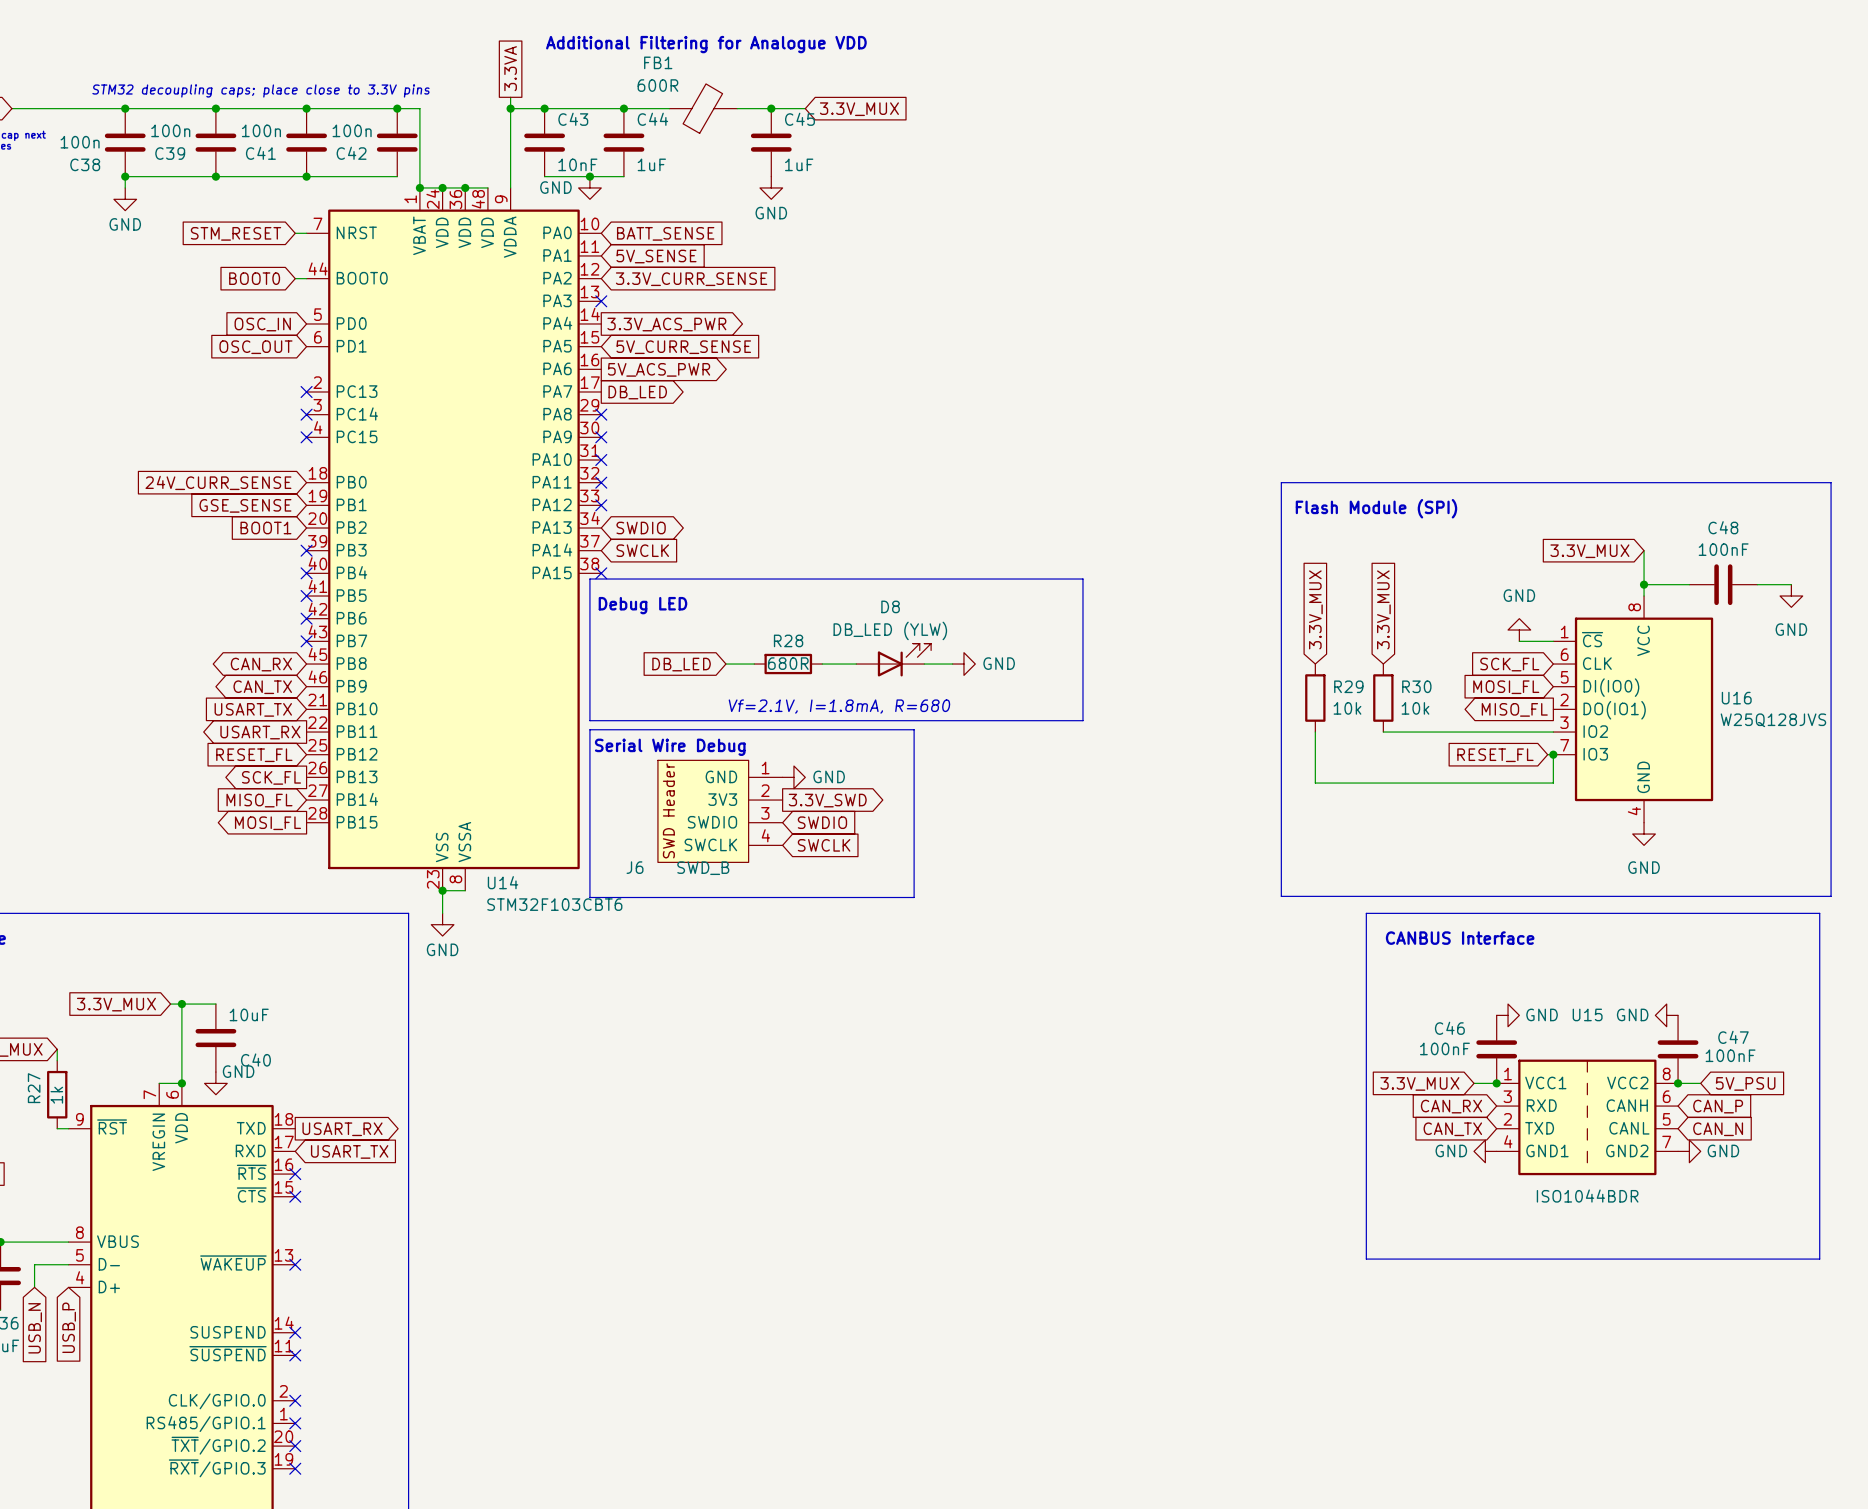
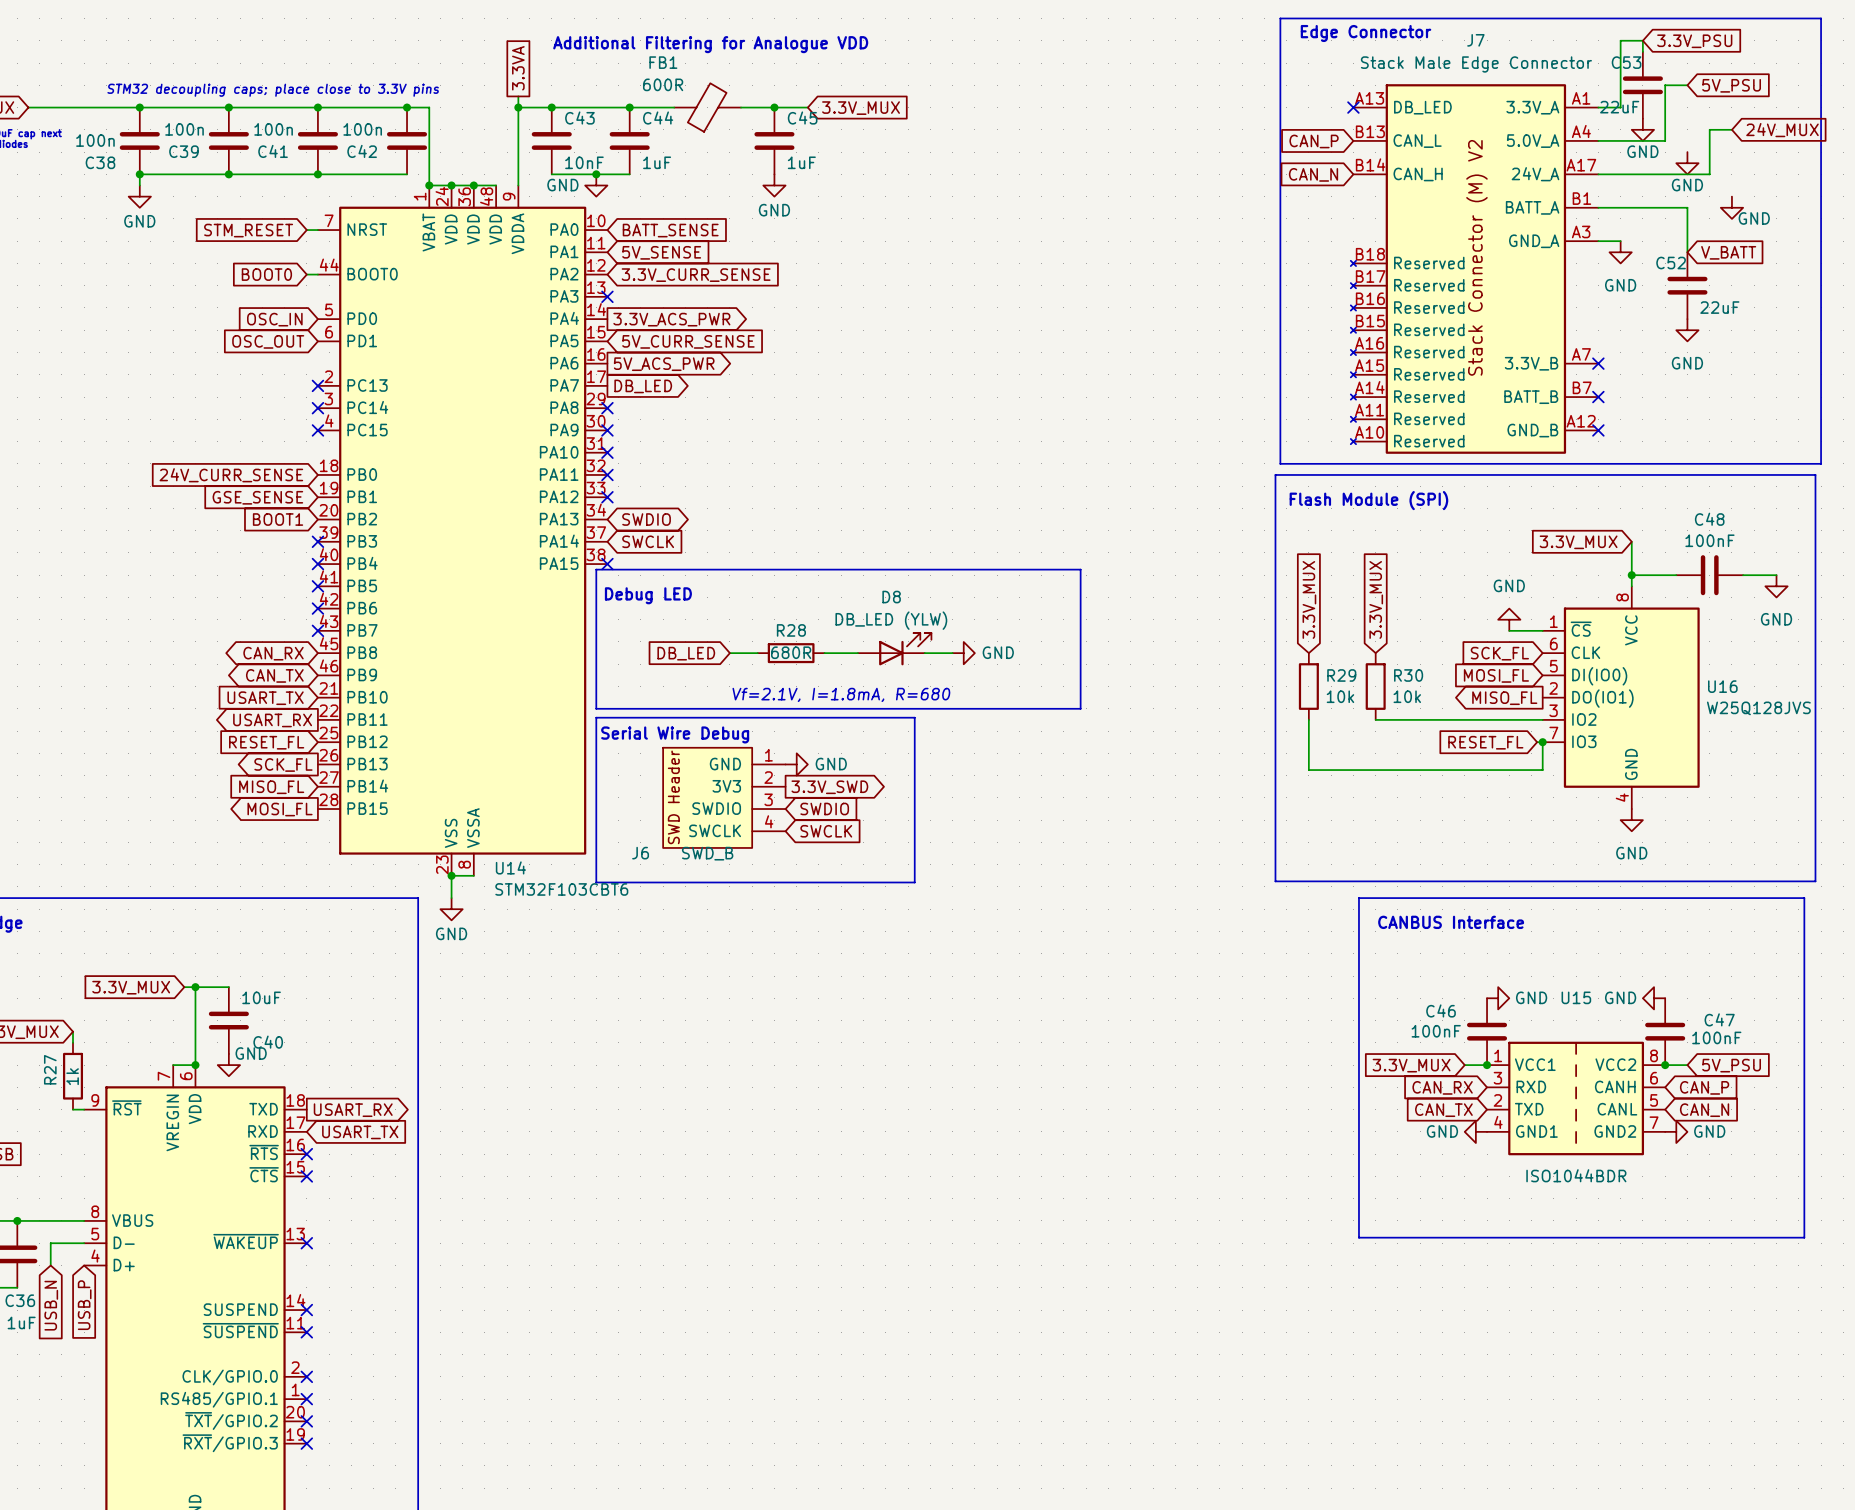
line: none -> (1280, 18) (1821, 18) (1821, 463) (1280, 463) (1280, 18)
text: none -> Edge Connector (1366, 33)
global label: none -> 3.3V_PSU (1694, 41)
wire: none -> (1642, 51) (1642, 40) (1620, 40) (1620, 107) (1598, 107)
C53: none -> 22uF (1642, 85)
wire: none -> (1687, 85) (1665, 85) (1665, 140) (1598, 140)
global label: none -> 5V_PSU (1731, 85)
no-connect mark: none -> (1353, 107)
power symbol: none -> GND (1642, 129)
wire: none -> (1731, 129) (1709, 129) (1709, 174) (1598, 174)
global label: none -> 24V_MUX (1782, 130)
global label: none -> CAN_P (1314, 141)
power symbol: none -> GND (1687, 163)
global label: none -> CAN_N (1313, 174)
wire: none -> (1598, 207) (1687, 207) (1687, 252)
power symbol: none -> GND (1731, 207)
wire: none -> (1598, 241) (1620, 241)
power symbol: none -> GND (1620, 252)
global label: none -> V_BATT (1728, 252)
J7: none -> Stack Male Edge Connector (1474, 269)
C52: none -> 22uF (1687, 285)
power symbol: none -> GND (1687, 330)
no-connect mark: none -> (1598, 363)
no-connect mark: none -> (1598, 397)
no-connect mark: none -> (1598, 430)

